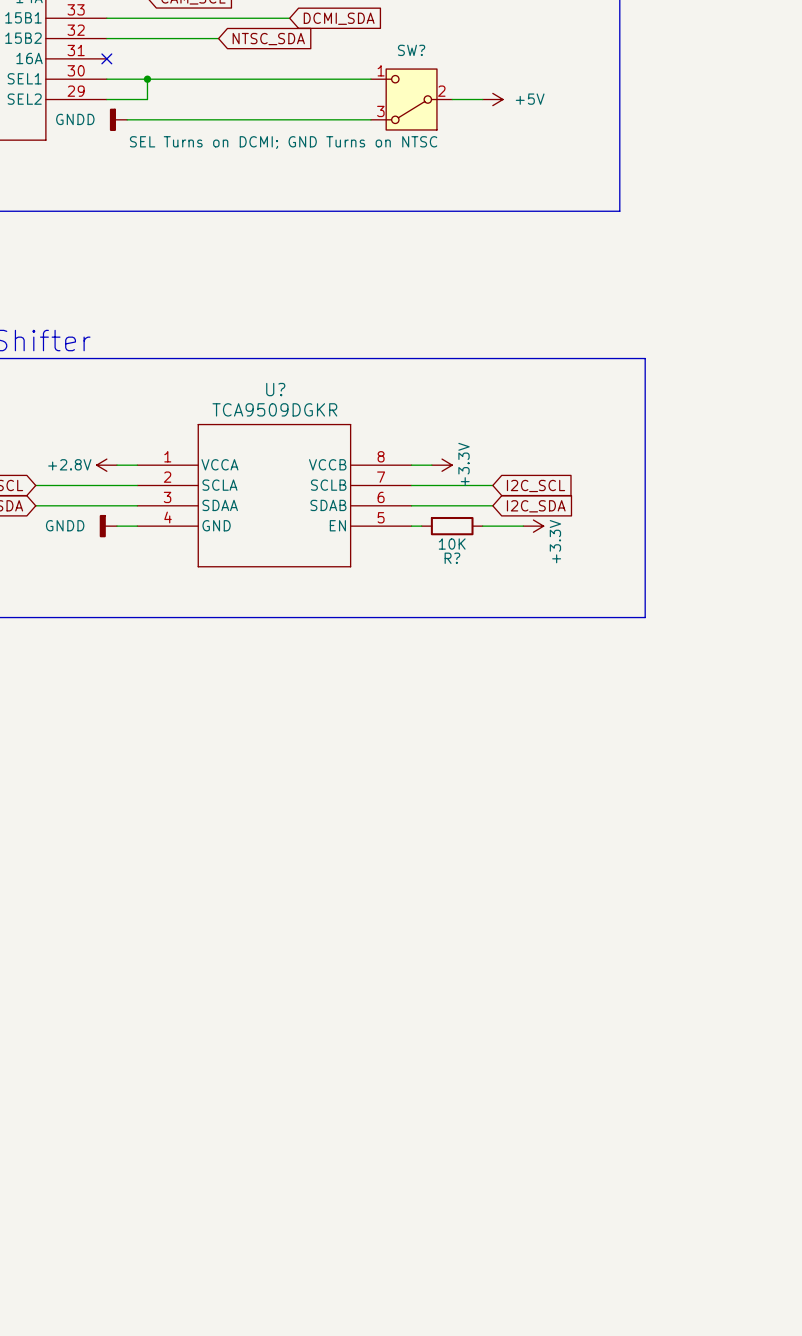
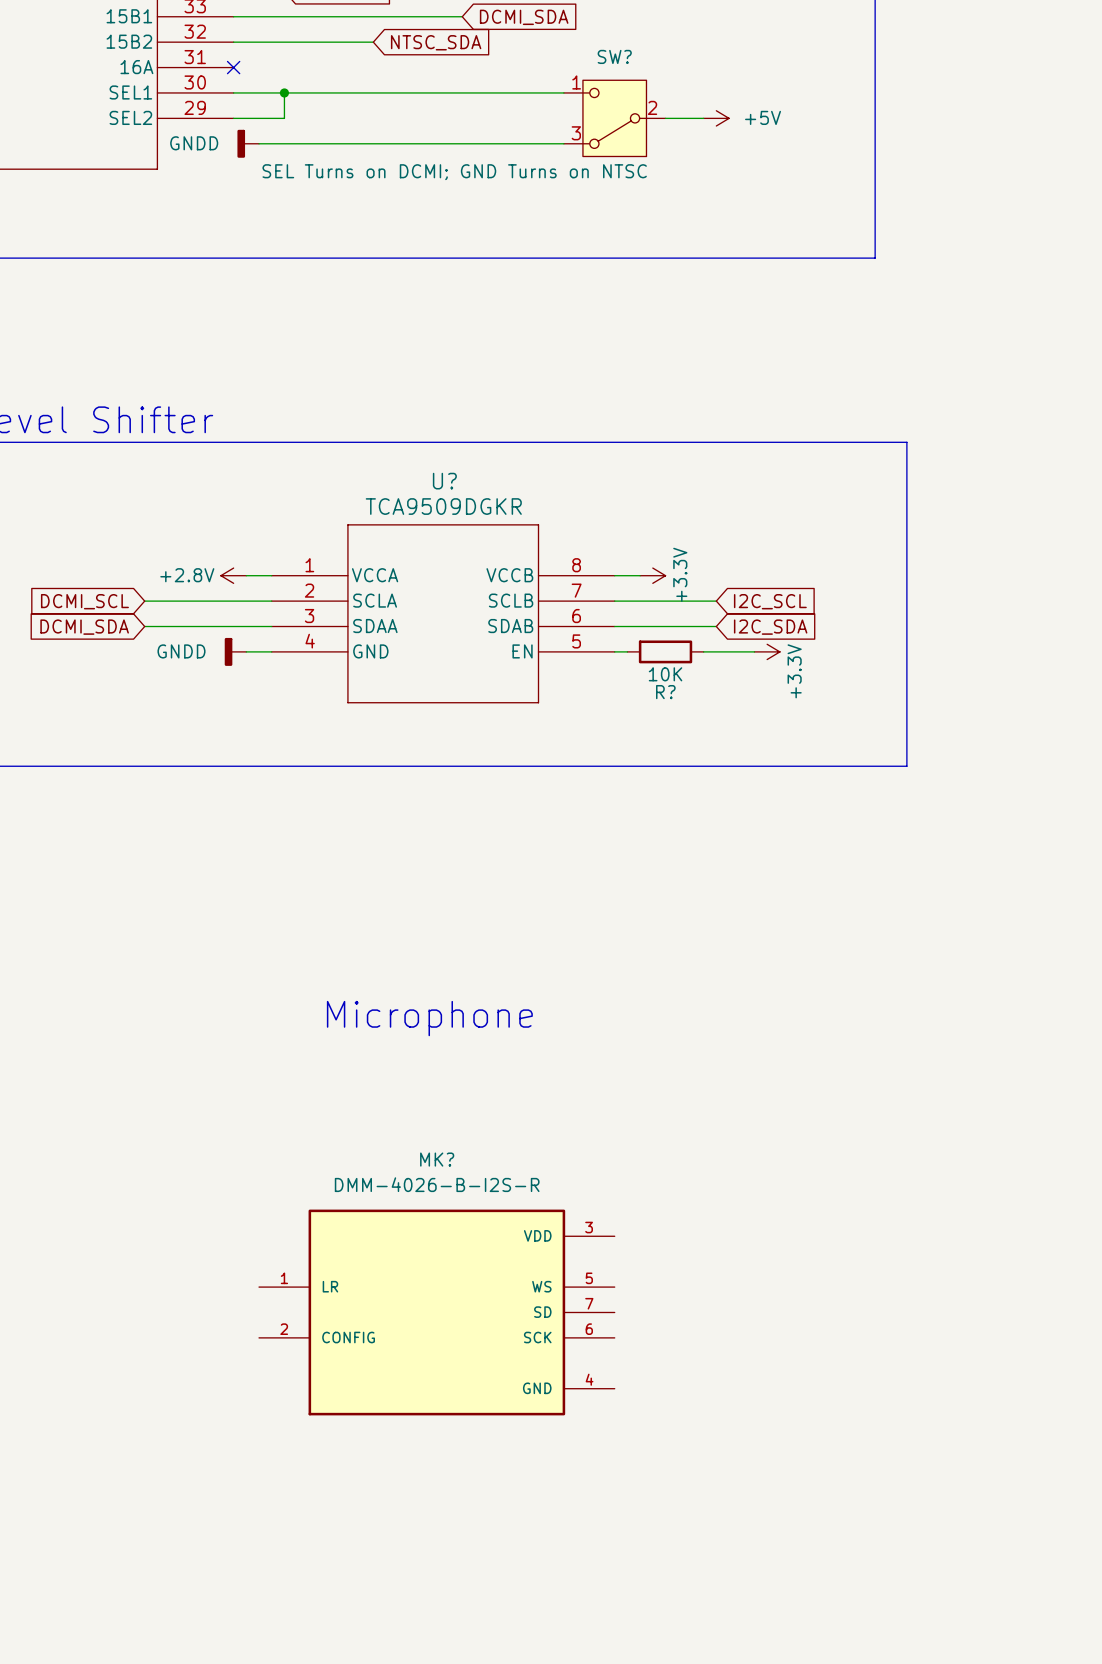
text: none -> Microphone (429, 1018)
MK?: none -> DMM-4026-B-I2S-R (436, 1312)

